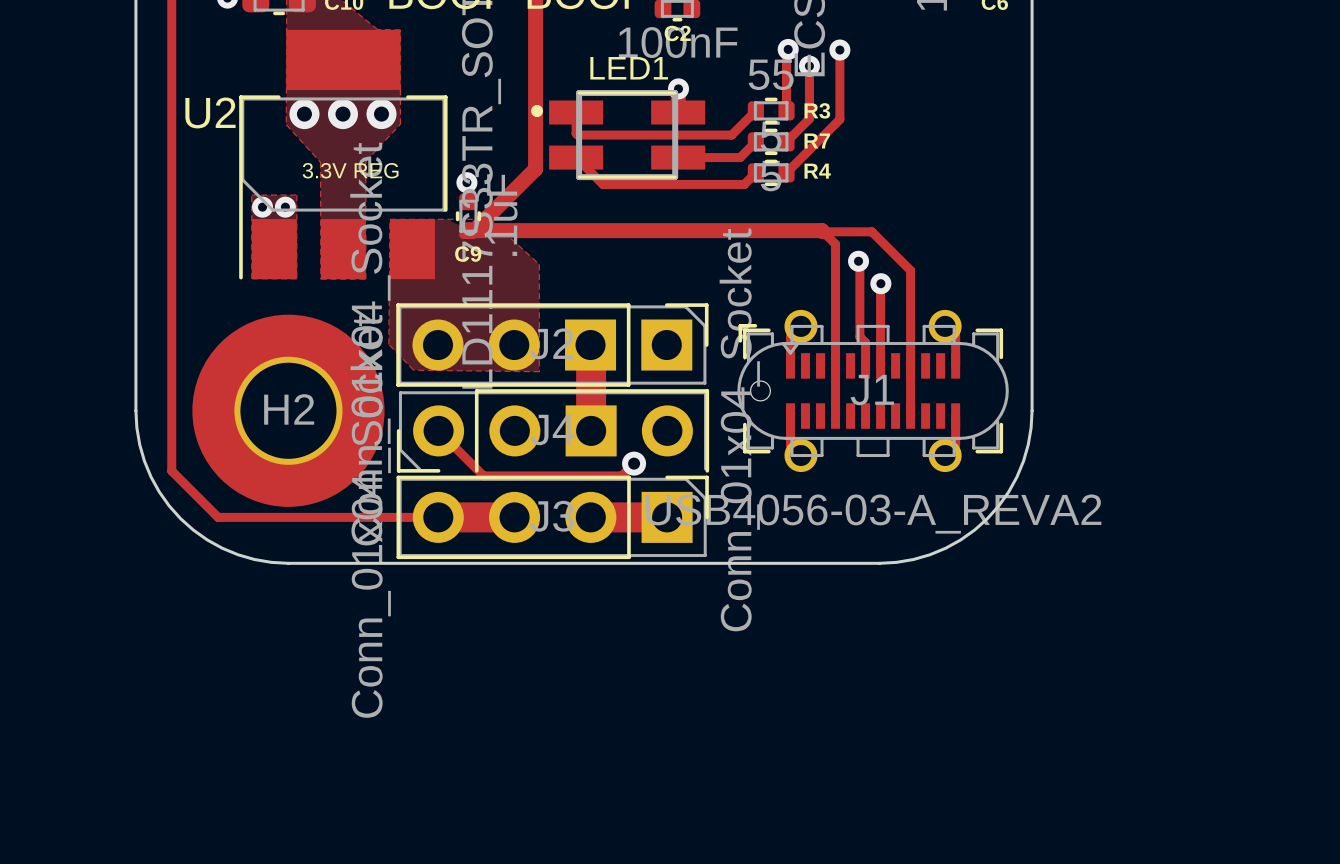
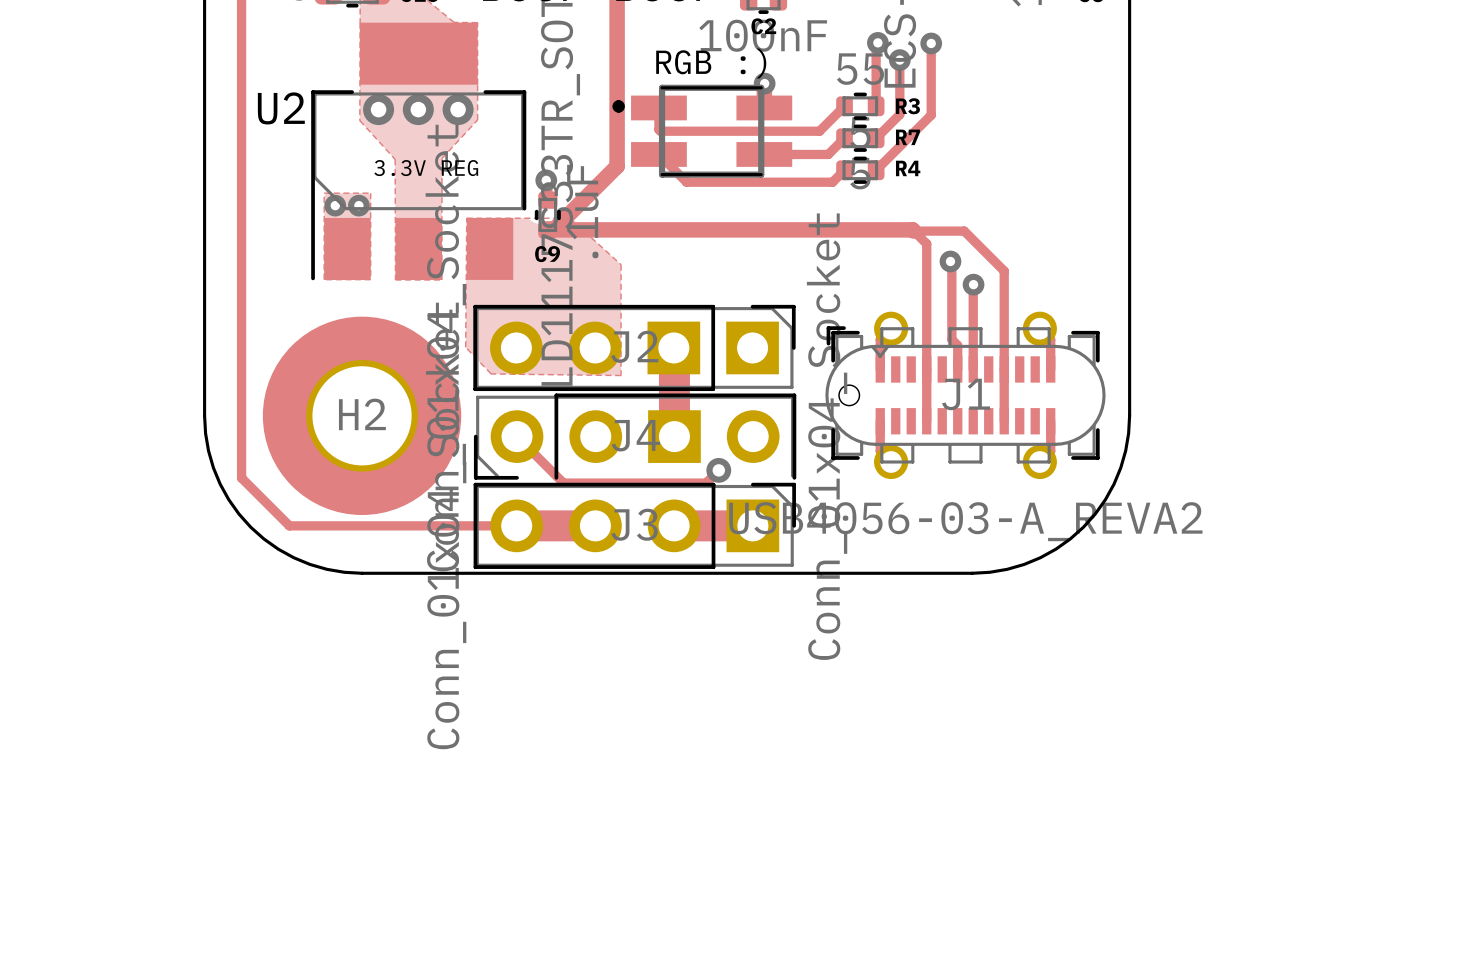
LED1 name: LED1 (629, 68) -> RGB :) (711, 63)

